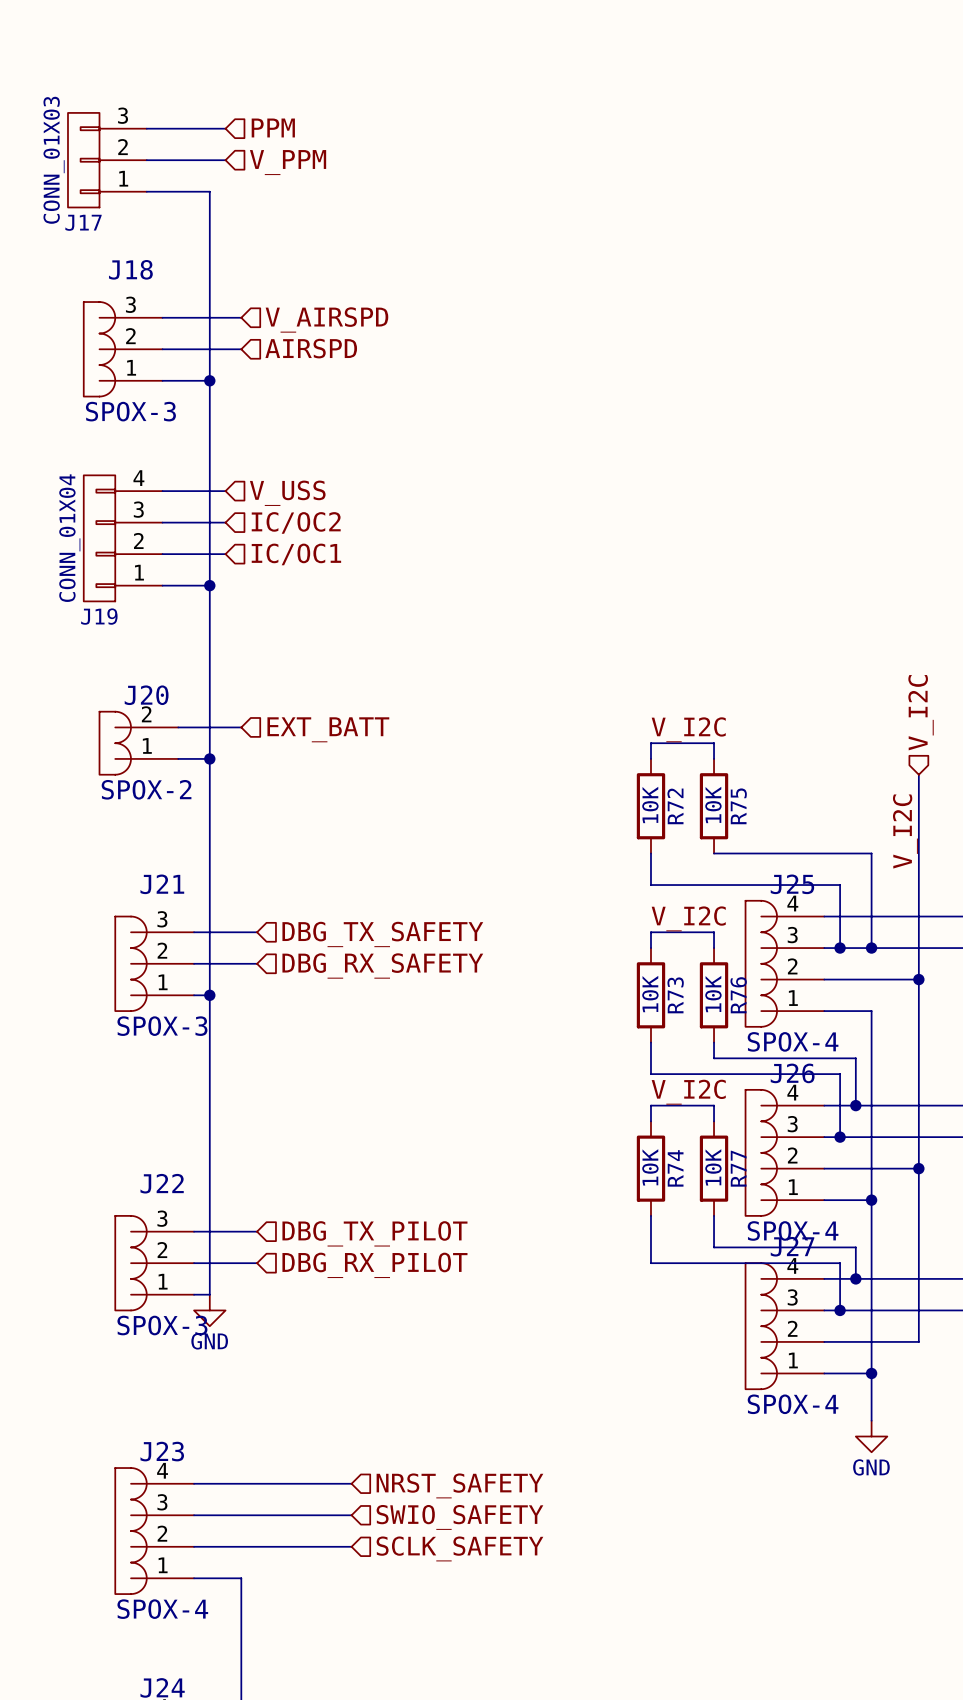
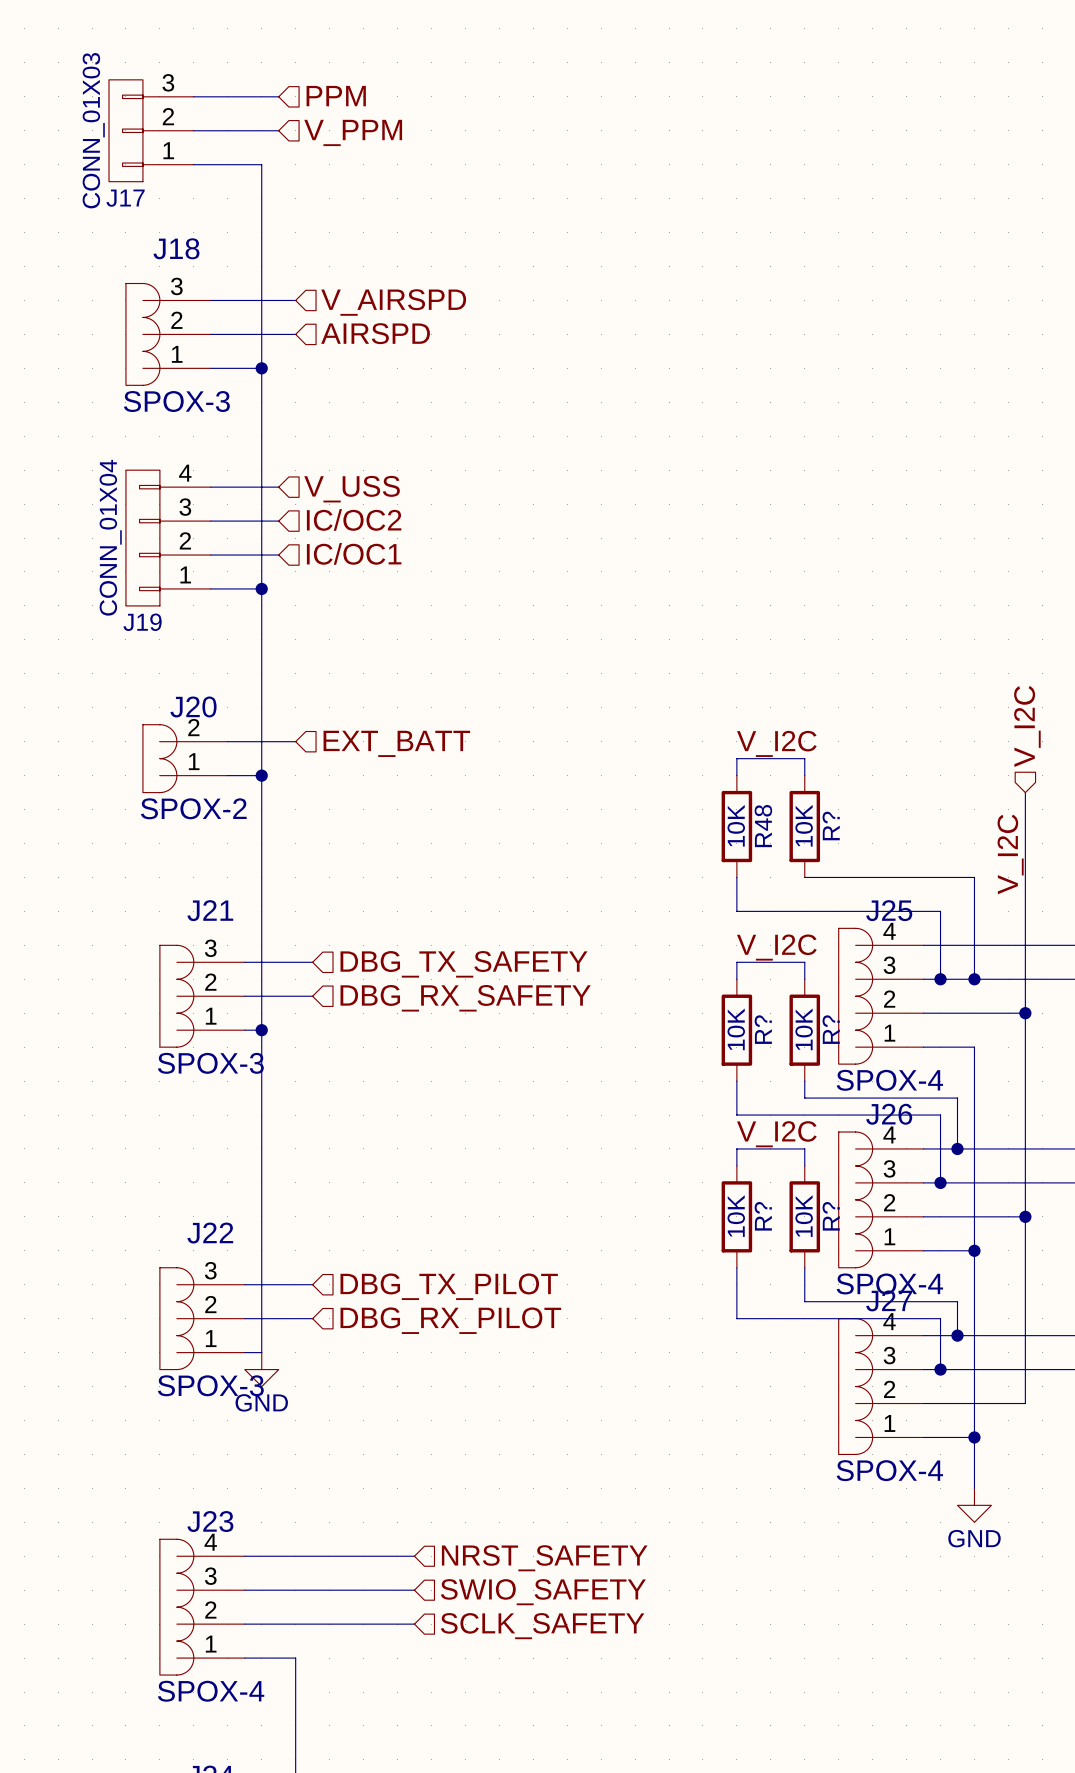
R72 name: R72 (675, 806) -> R48 (763, 826)
R75 name: R75 (738, 806) -> R? (831, 825)
R73 name: R73 (675, 995) -> R? (763, 1029)
R76 name: R76 (738, 995) -> R? (831, 1029)
R74 name: R74 (675, 1168) -> R? (763, 1216)
R77 name: R77 (738, 1168) -> R? (831, 1216)

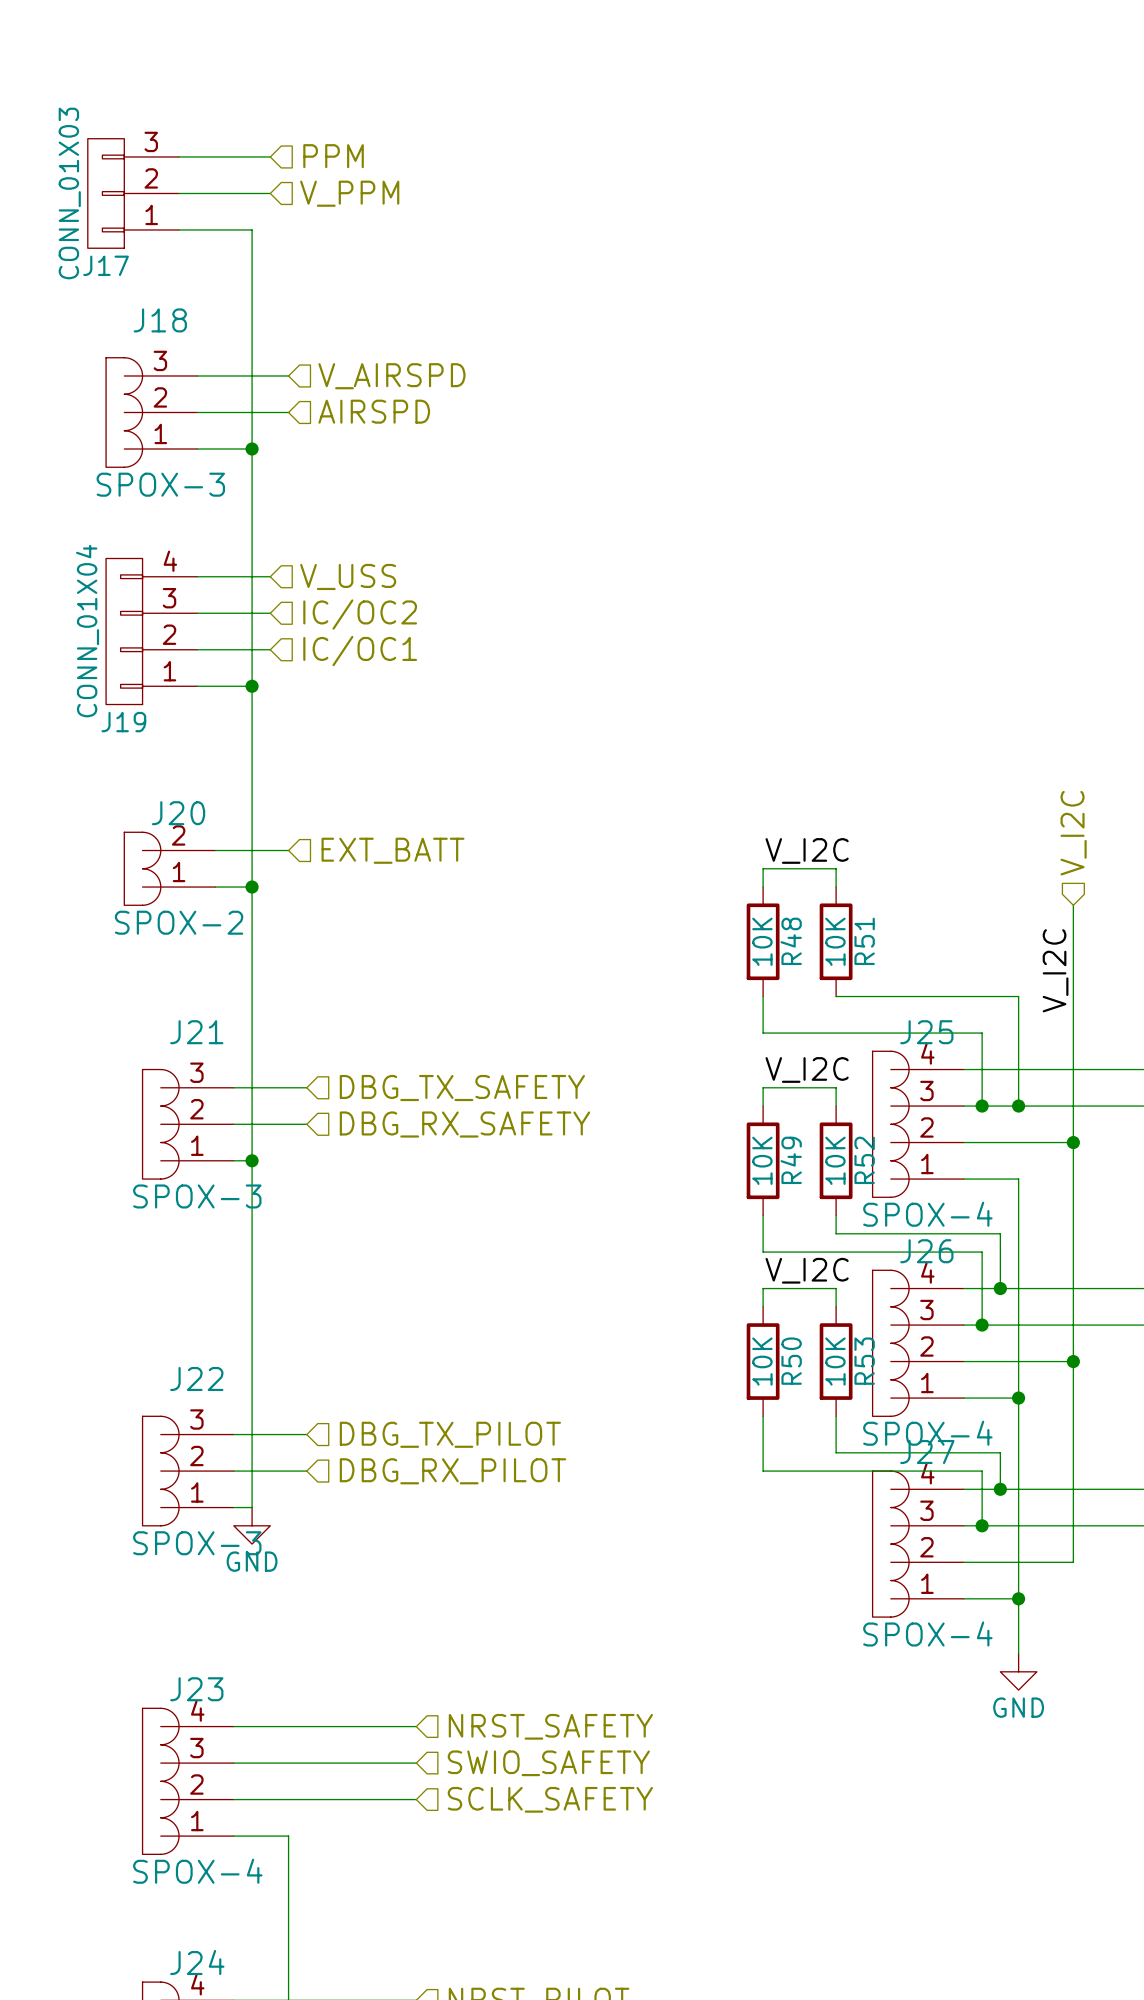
R? name: R? (831, 825) -> R51 (864, 941)
R? name: R? (763, 1029) -> R49 (791, 1160)
R? name: R? (831, 1029) -> R52 (864, 1160)
R? name: R? (763, 1216) -> R50 (791, 1361)
R? name: R? (831, 1216) -> R53 (864, 1361)

